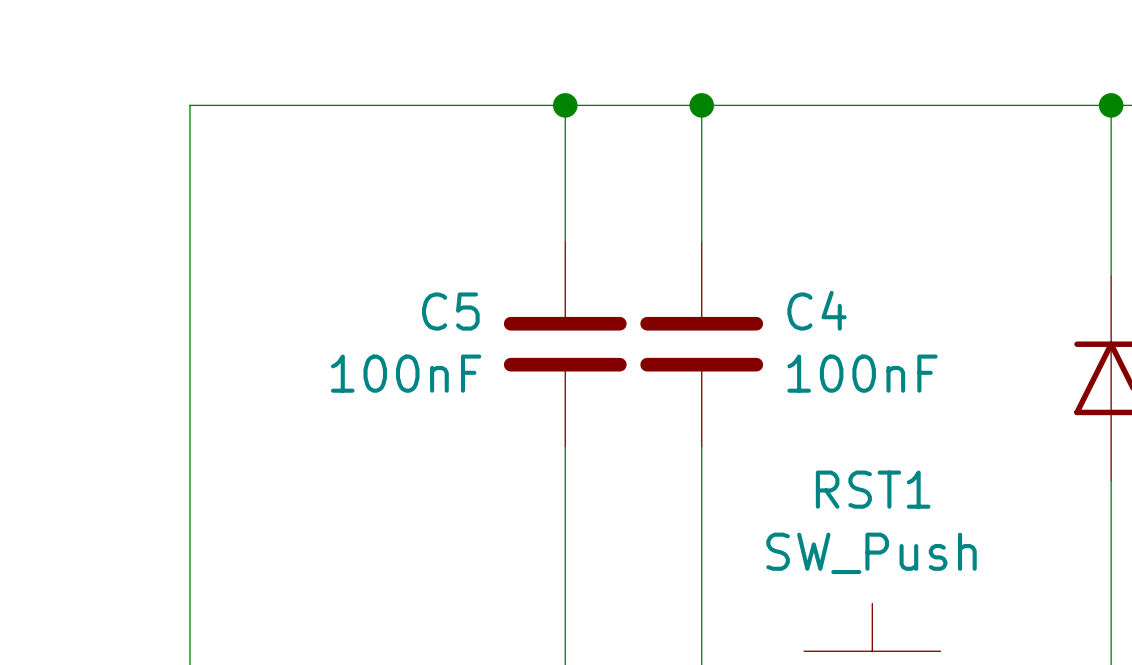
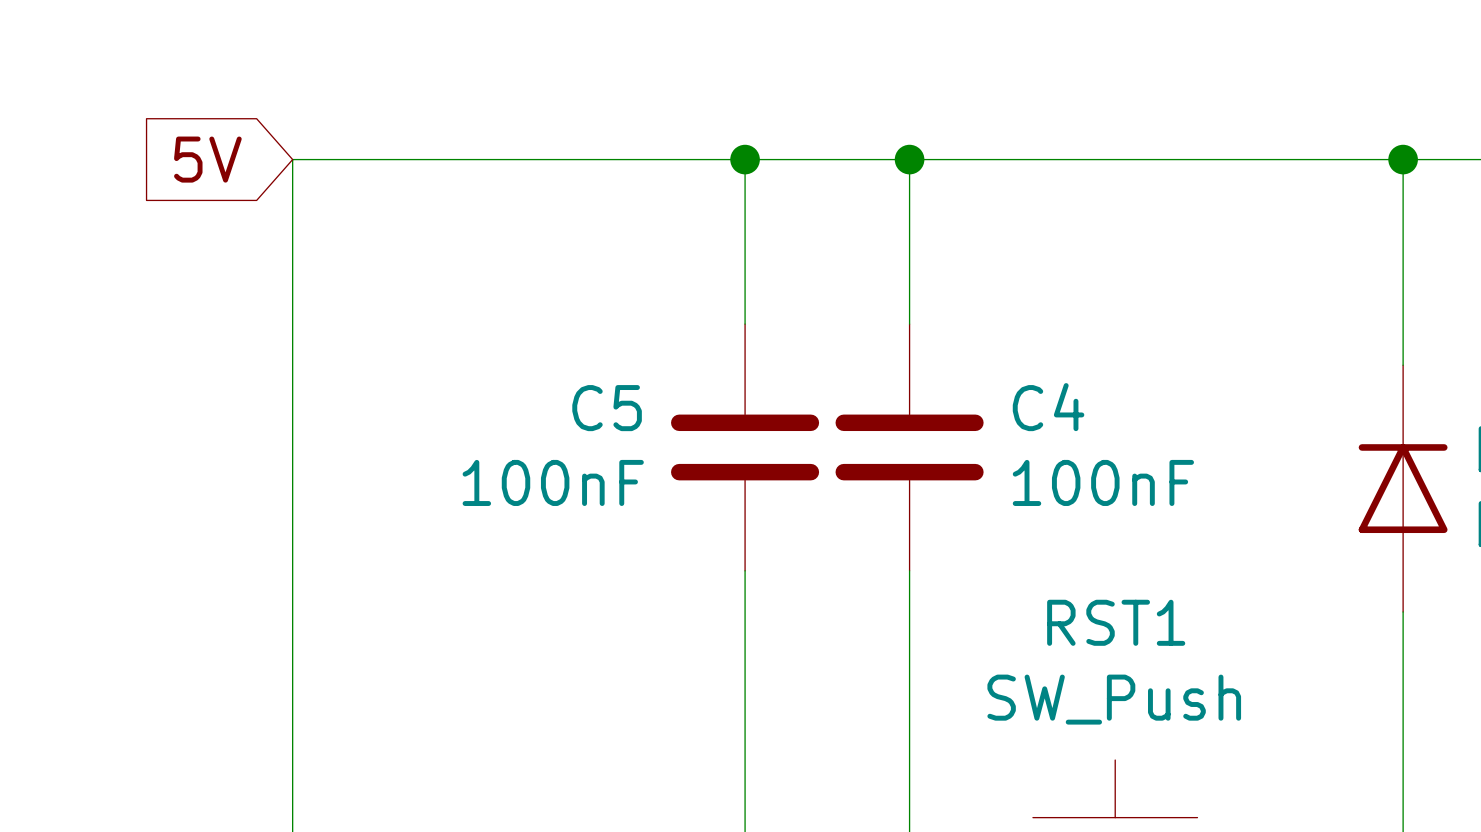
global label: none -> 5V (207, 159)

